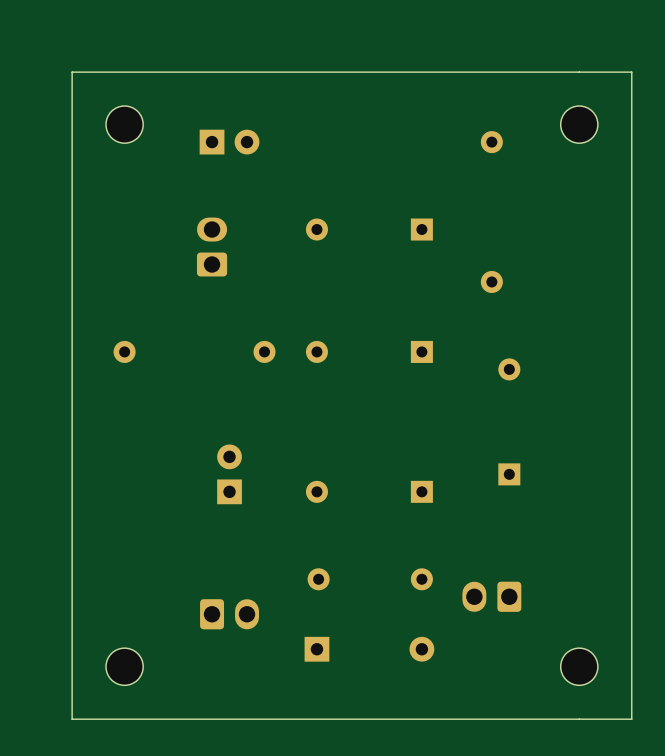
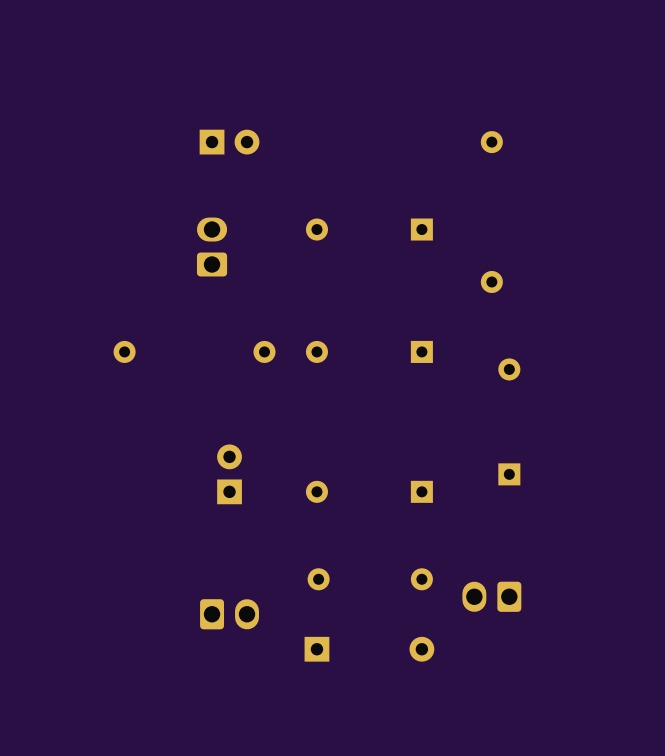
board edge: (631, 72) (631, 719) (72, 719) (72, 72) (631, 72) -> none
part: (124, 124) -> none
part: (579, 124) -> none
part: (124, 666) -> none
part: (579, 666) -> none

